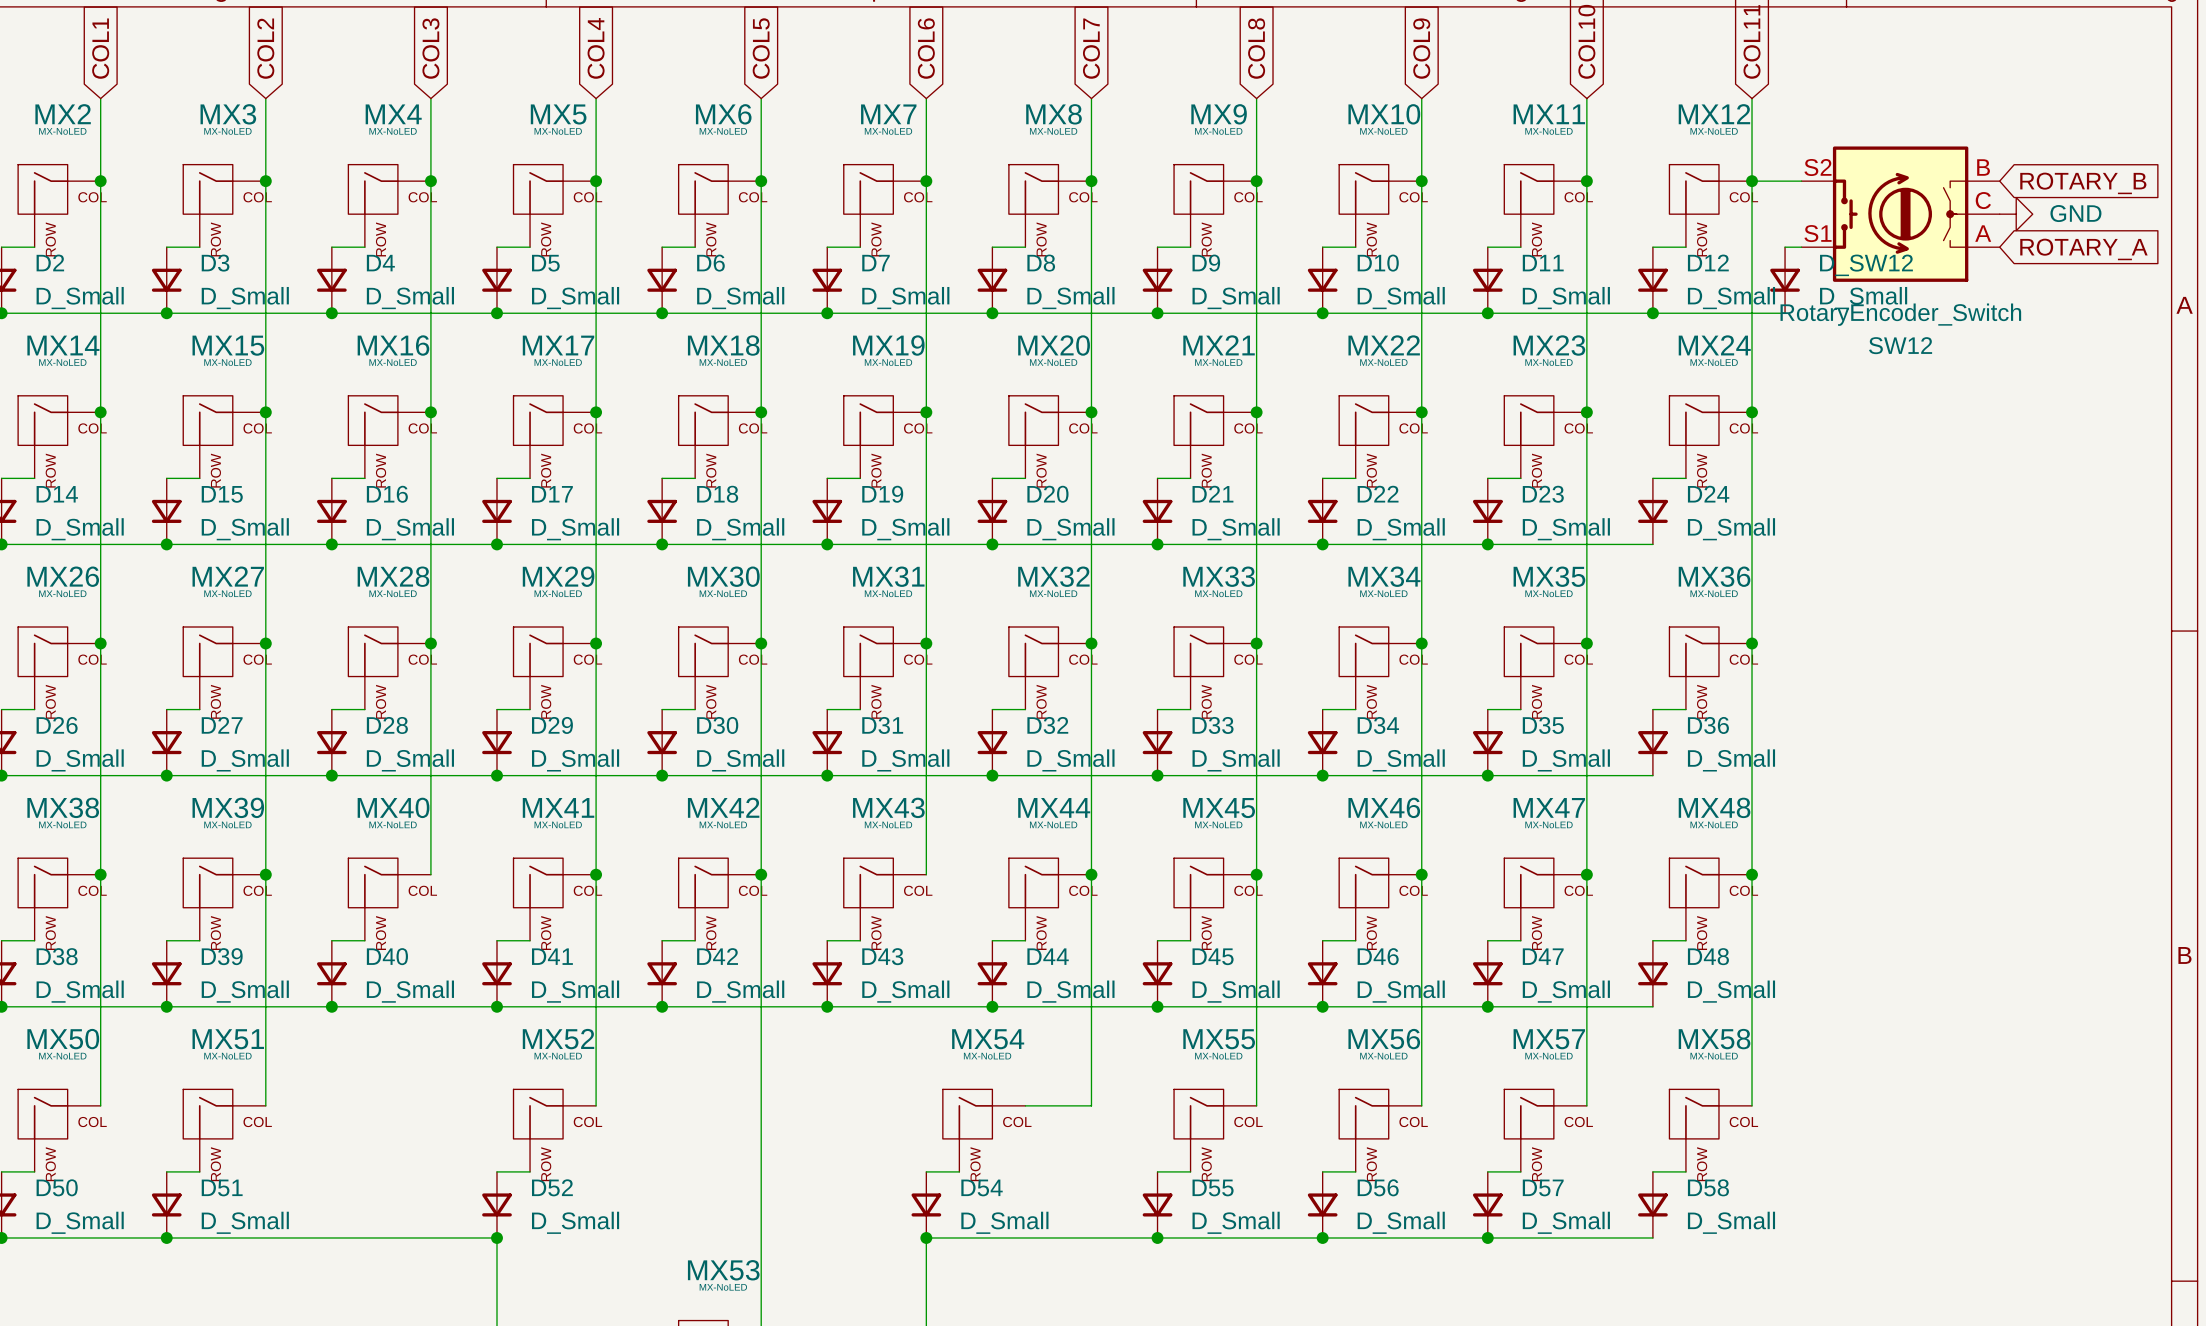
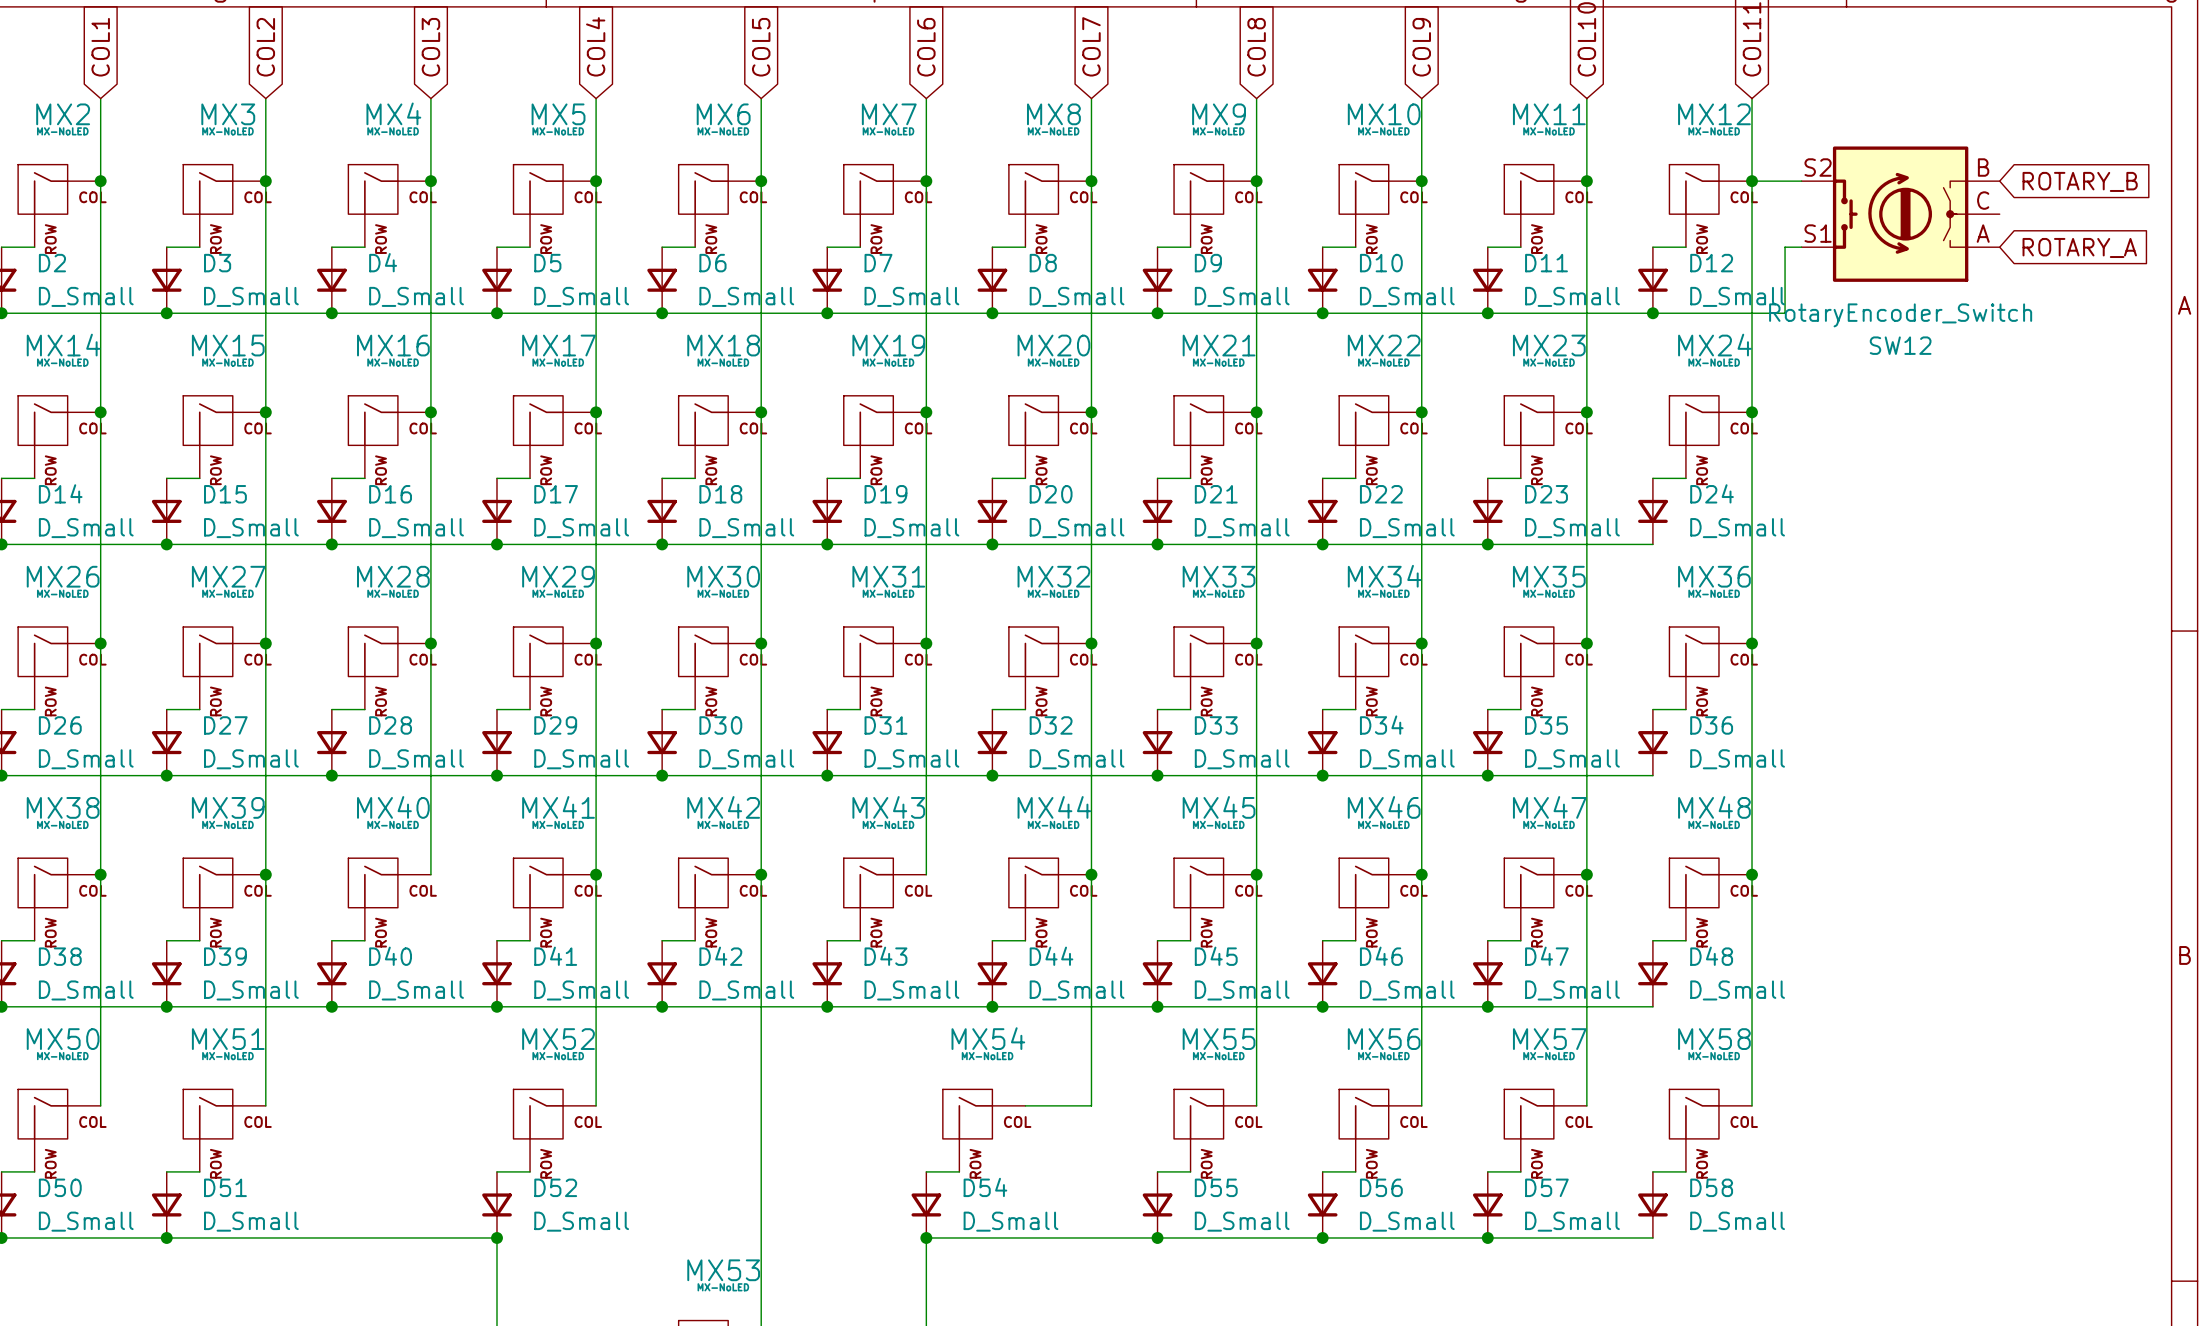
power symbol: GND (2016, 214) -> none
D_SW12: D_Small (1785, 280) -> none

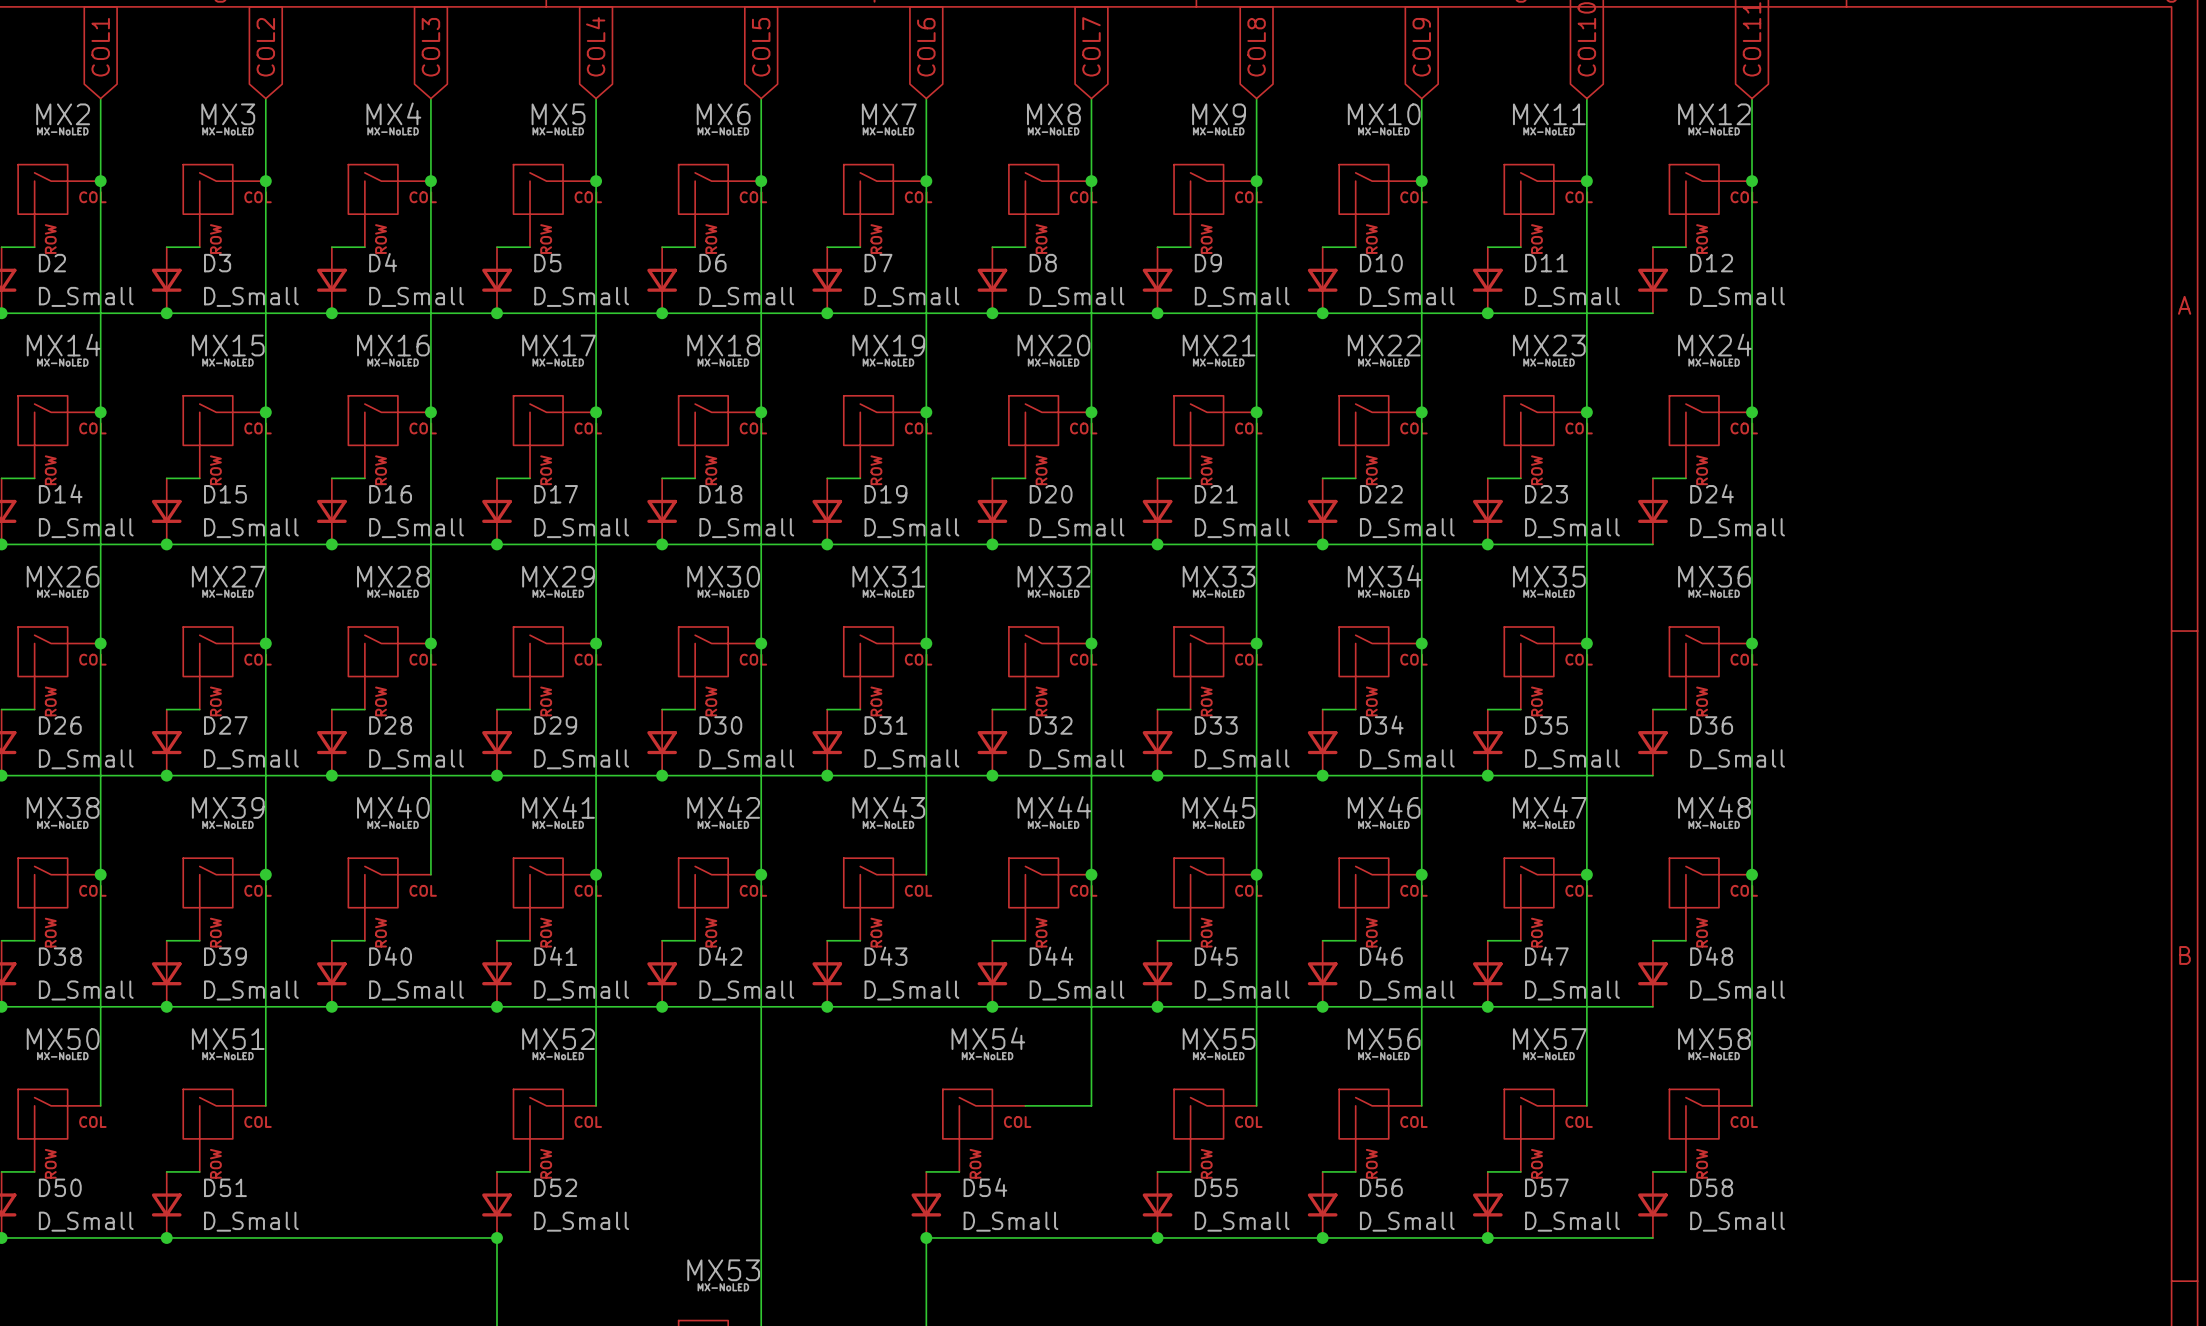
wire: (1752, 181) (1801, 181) -> none
global label: ROTARY_B (2080, 181) -> none
SW12: RotaryEncoder_Switch (1900, 214) -> none
wire: (1801, 247) (1785, 247) (1785, 313) (1652, 313) -> none
global label: ROTARY_A (2079, 247) -> none
junction: (1652, 313) -> none

